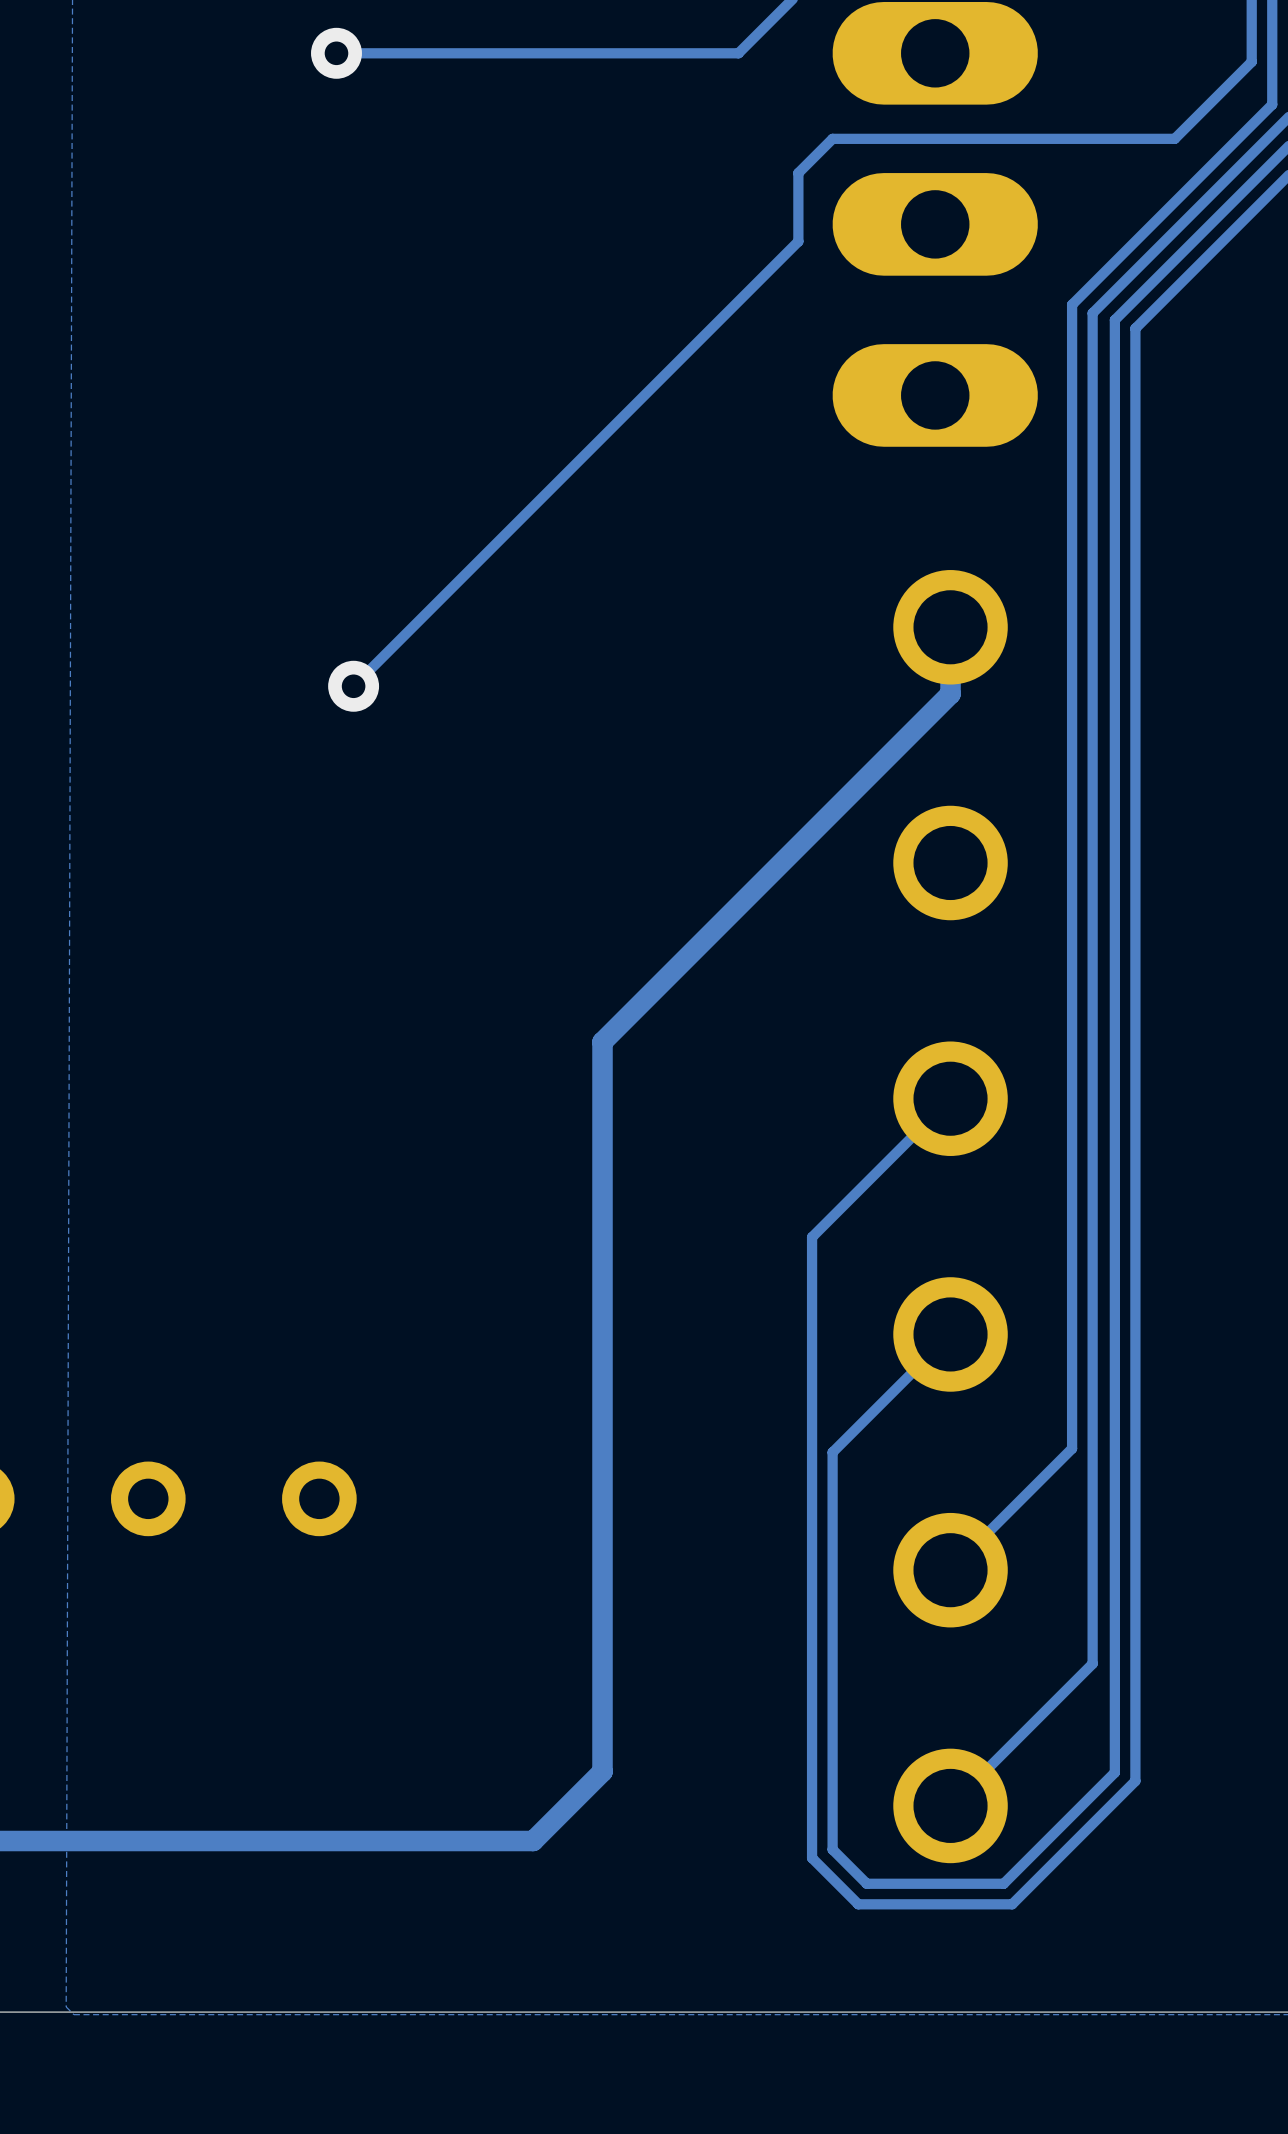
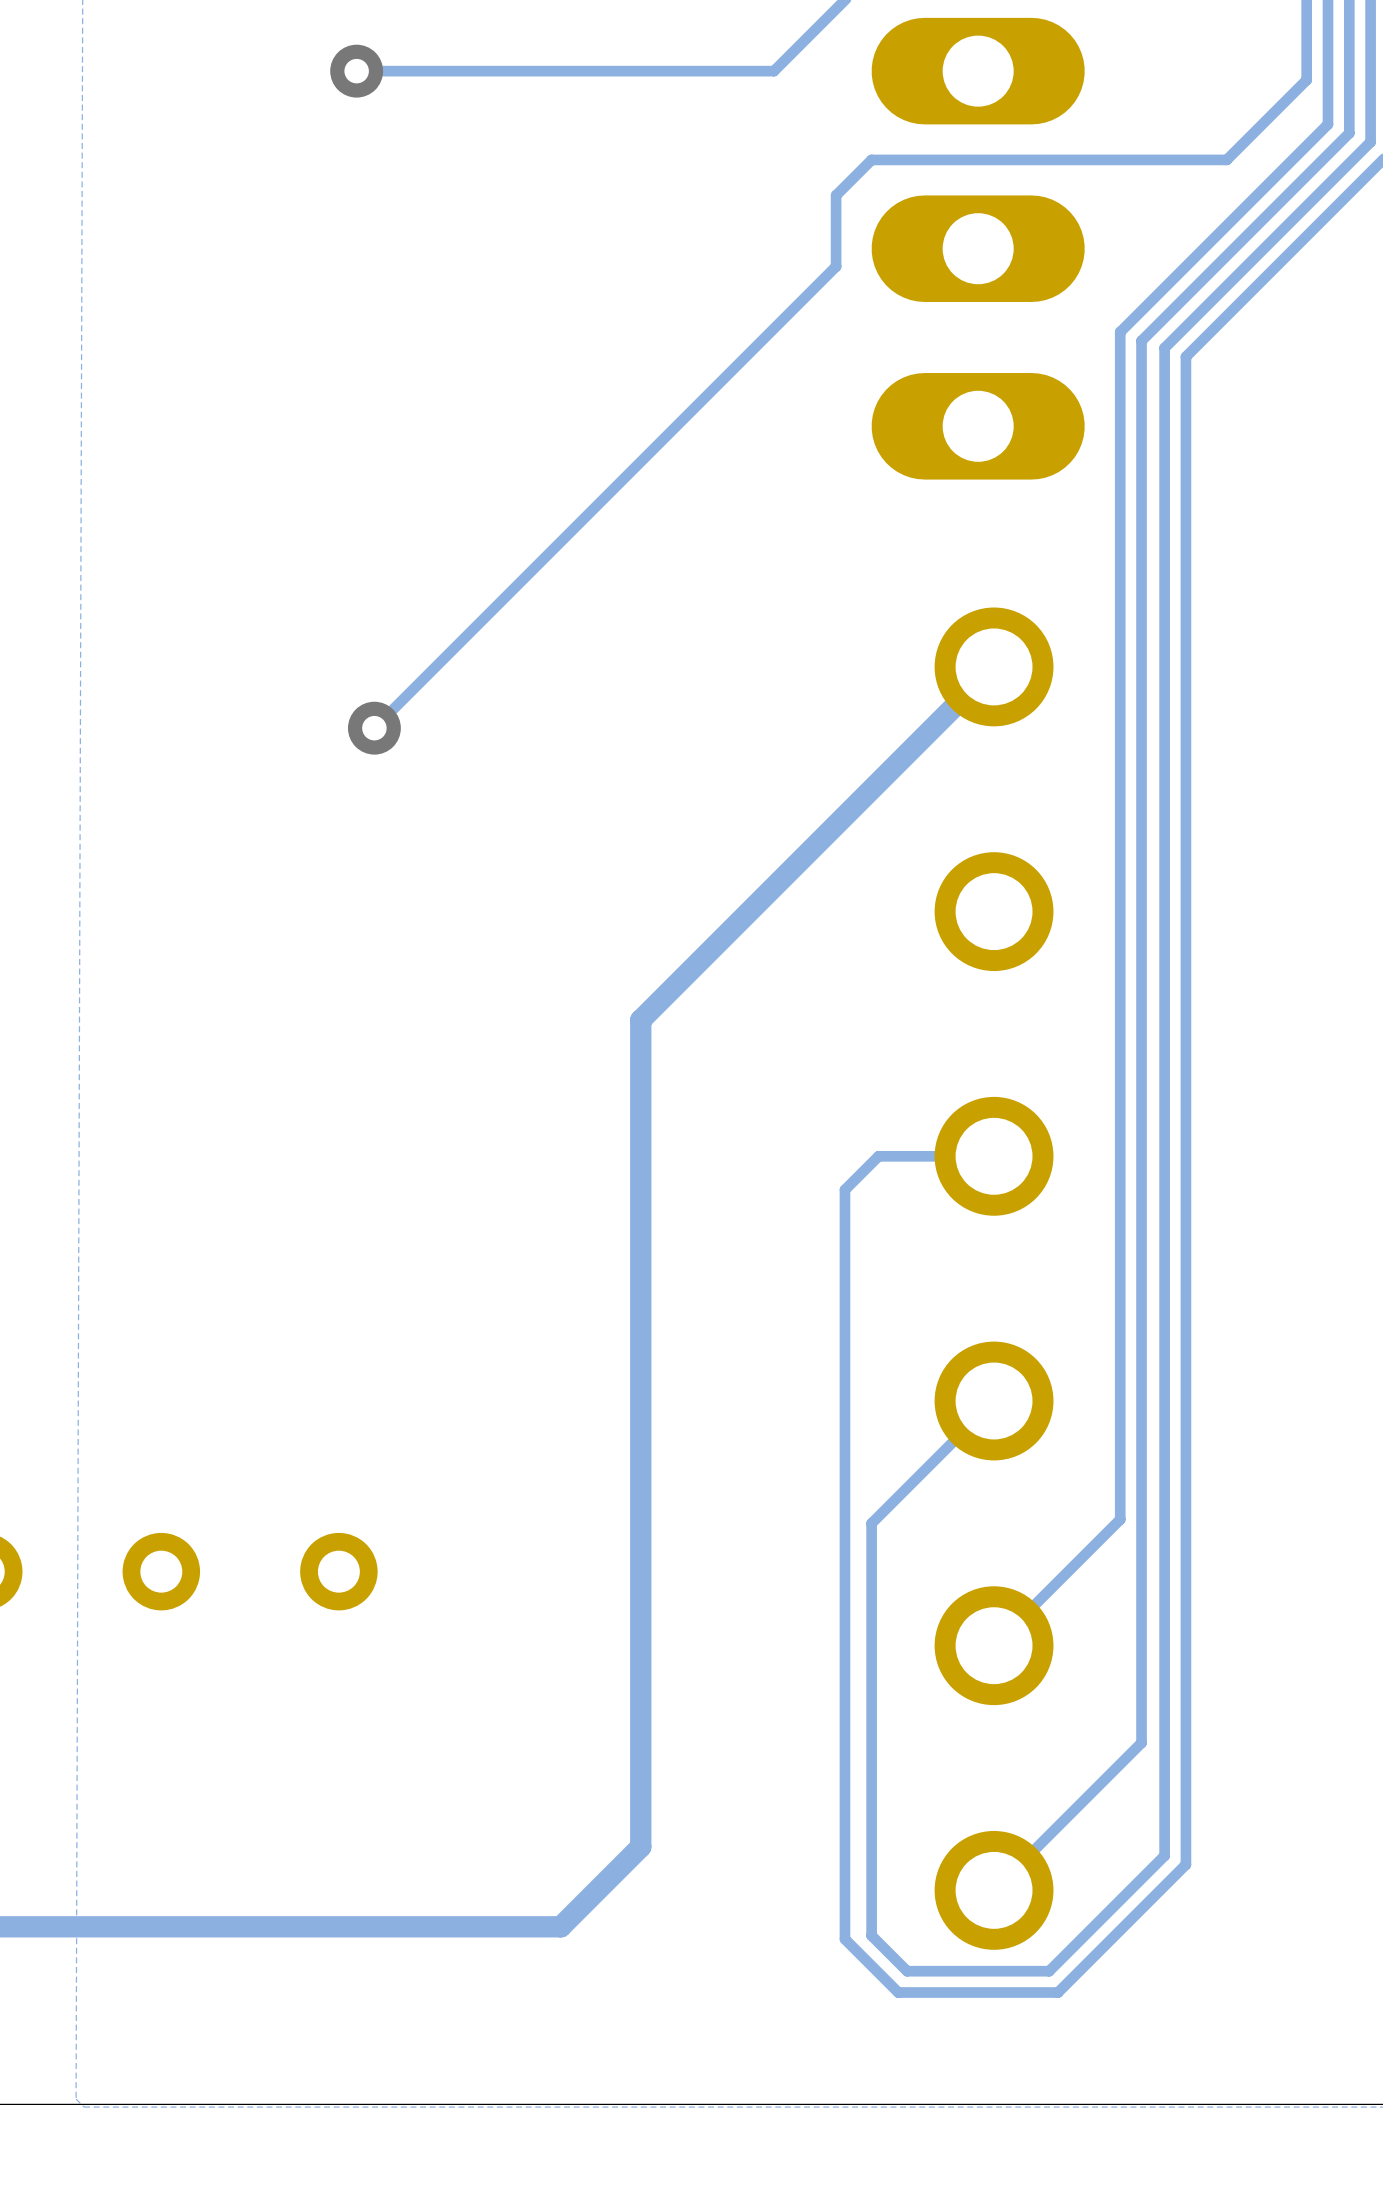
track: (950, 627) (950, 693) (602, 1042) (602, 1771) -> (994, 666) (640, 1020) (640, 1846) (632, 1854)
track: (950, 1098) (812, 1237) (812, 1858) -> (994, 1156) (878, 1156) (844, 1189) (844, 1939) (850, 1944)

